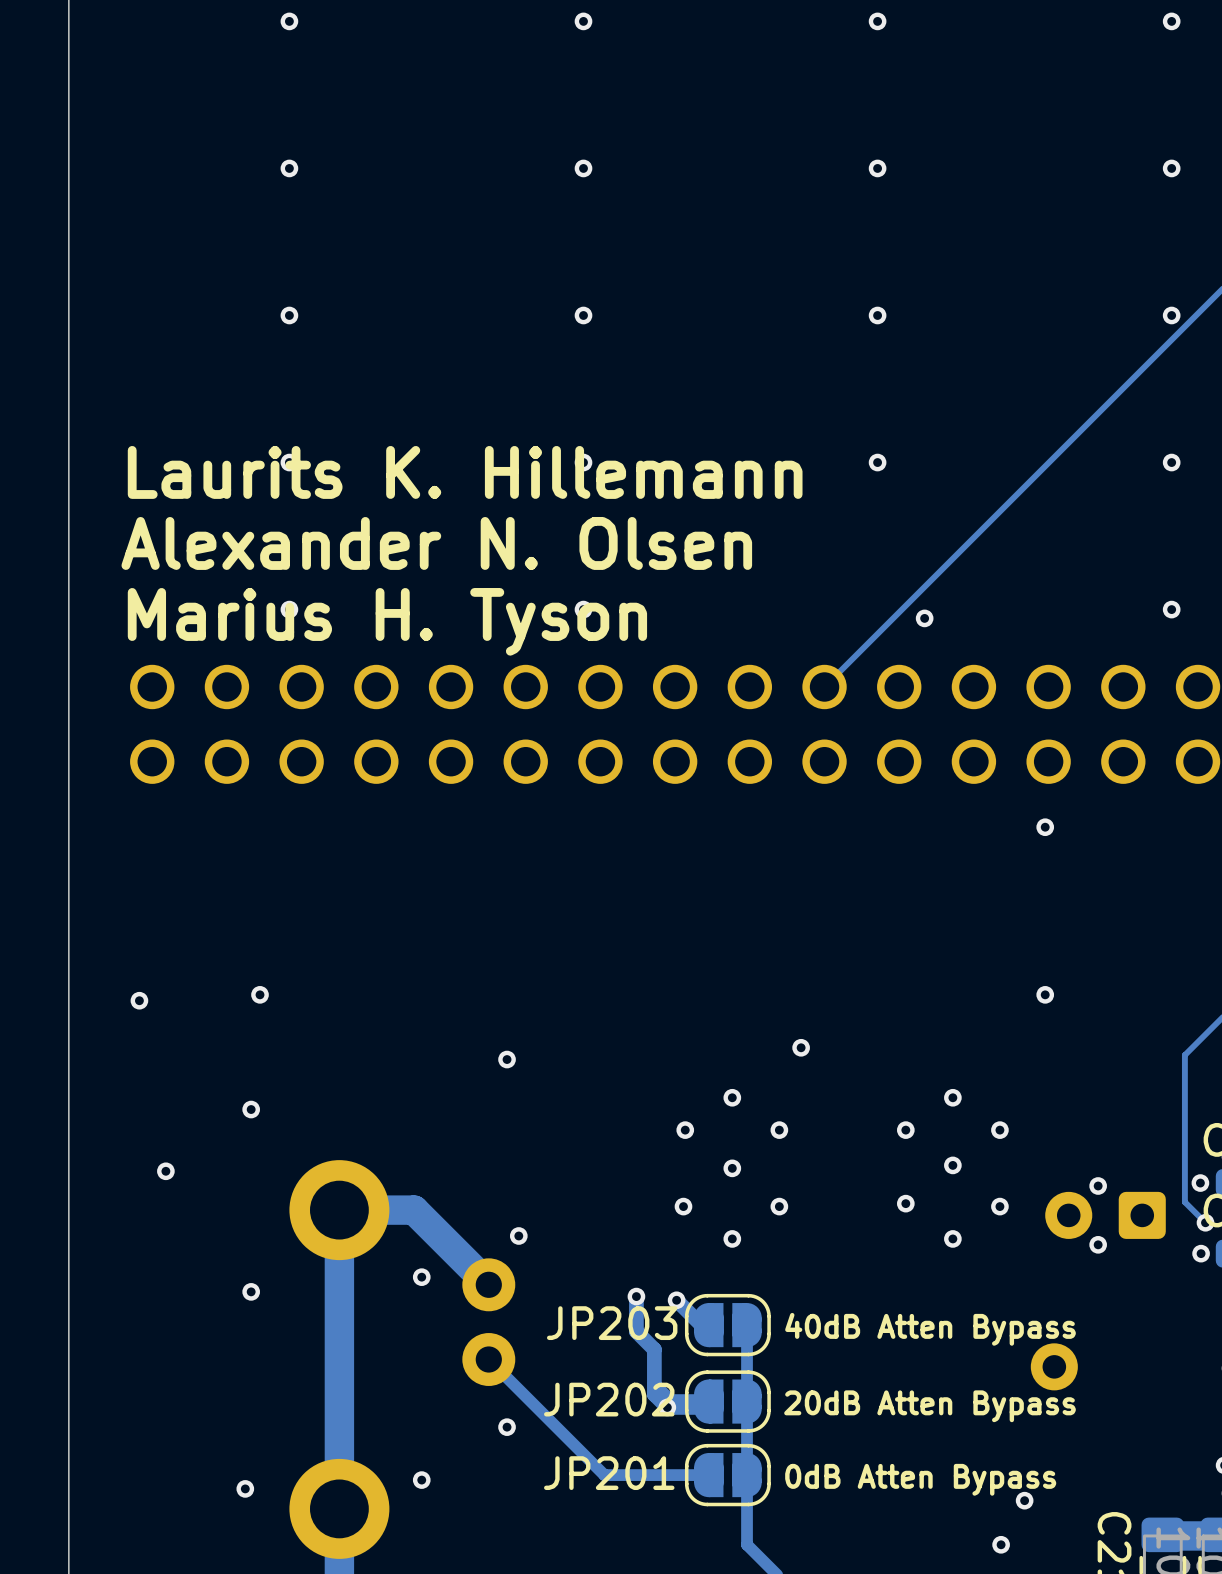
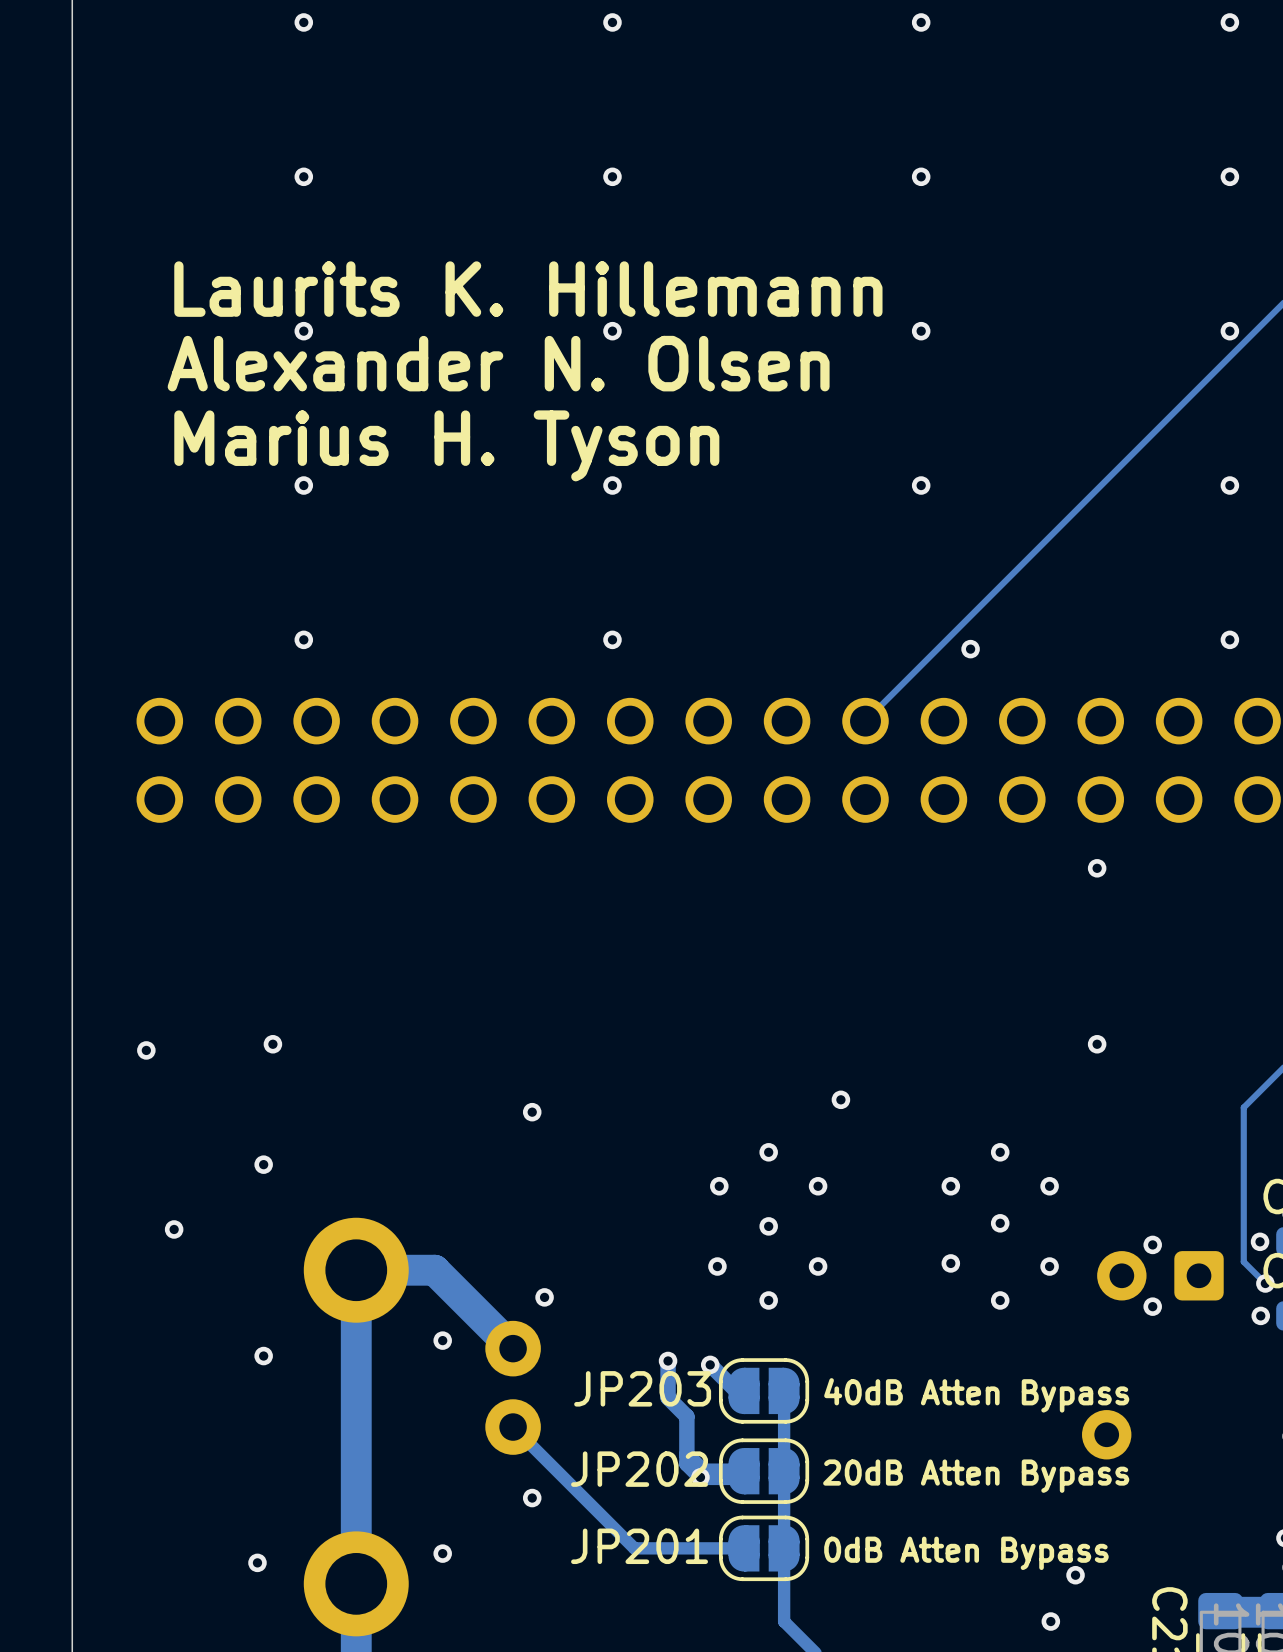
text position: Laurits K. Hillemann (465, 472) -> Laurits K. Hillemann (528, 289)
text position: Alexander N. Olsen (436, 543) -> Alexander N. Olsen (498, 363)
text position: Marius H. Tyson (387, 621) -> Marius H. Tyson (446, 445)

